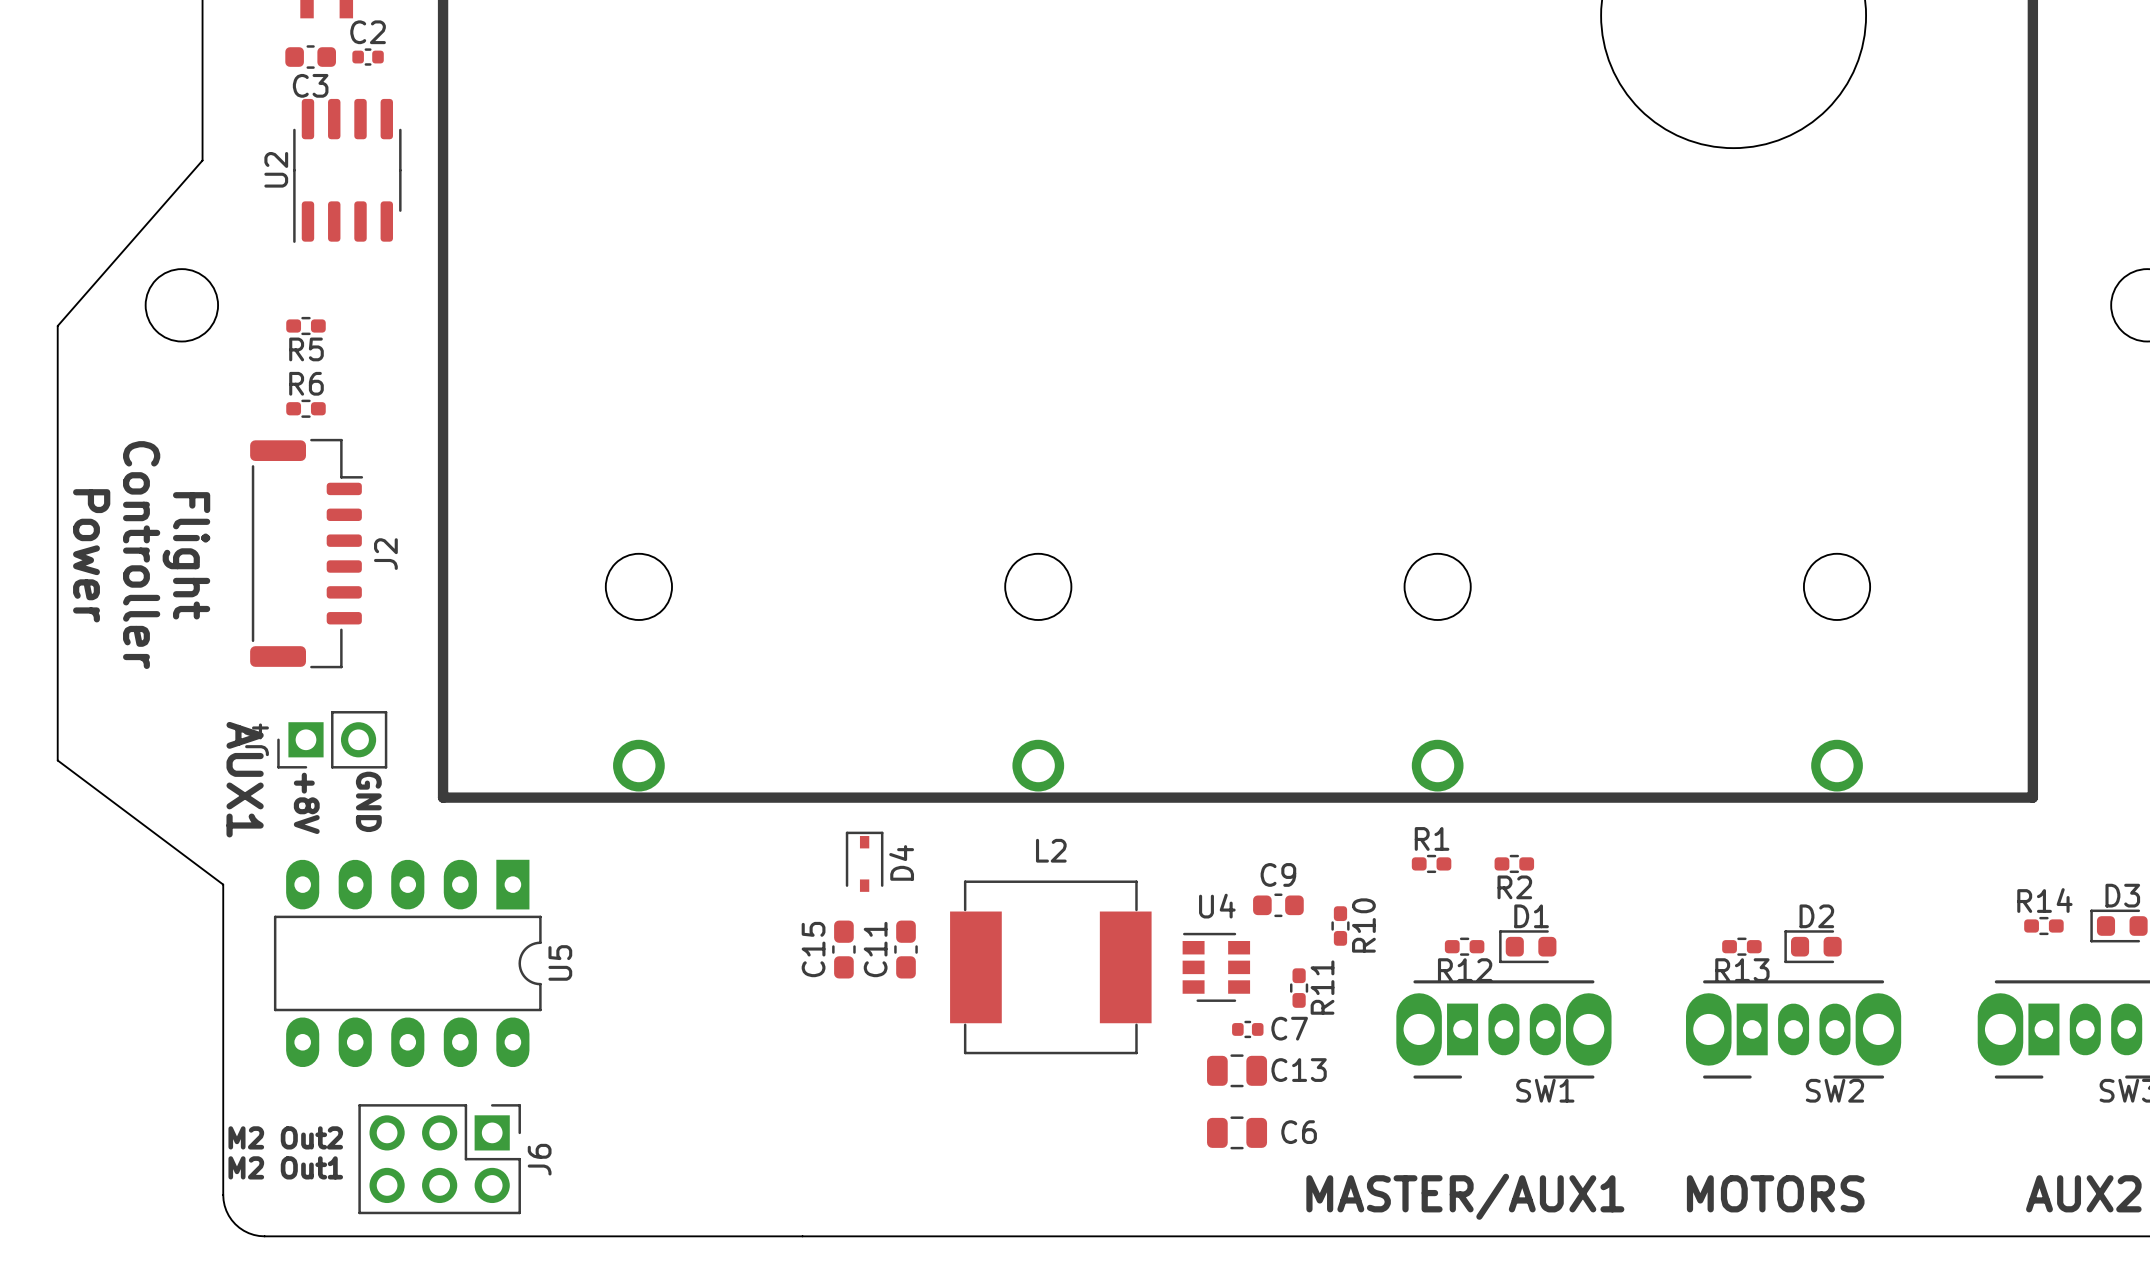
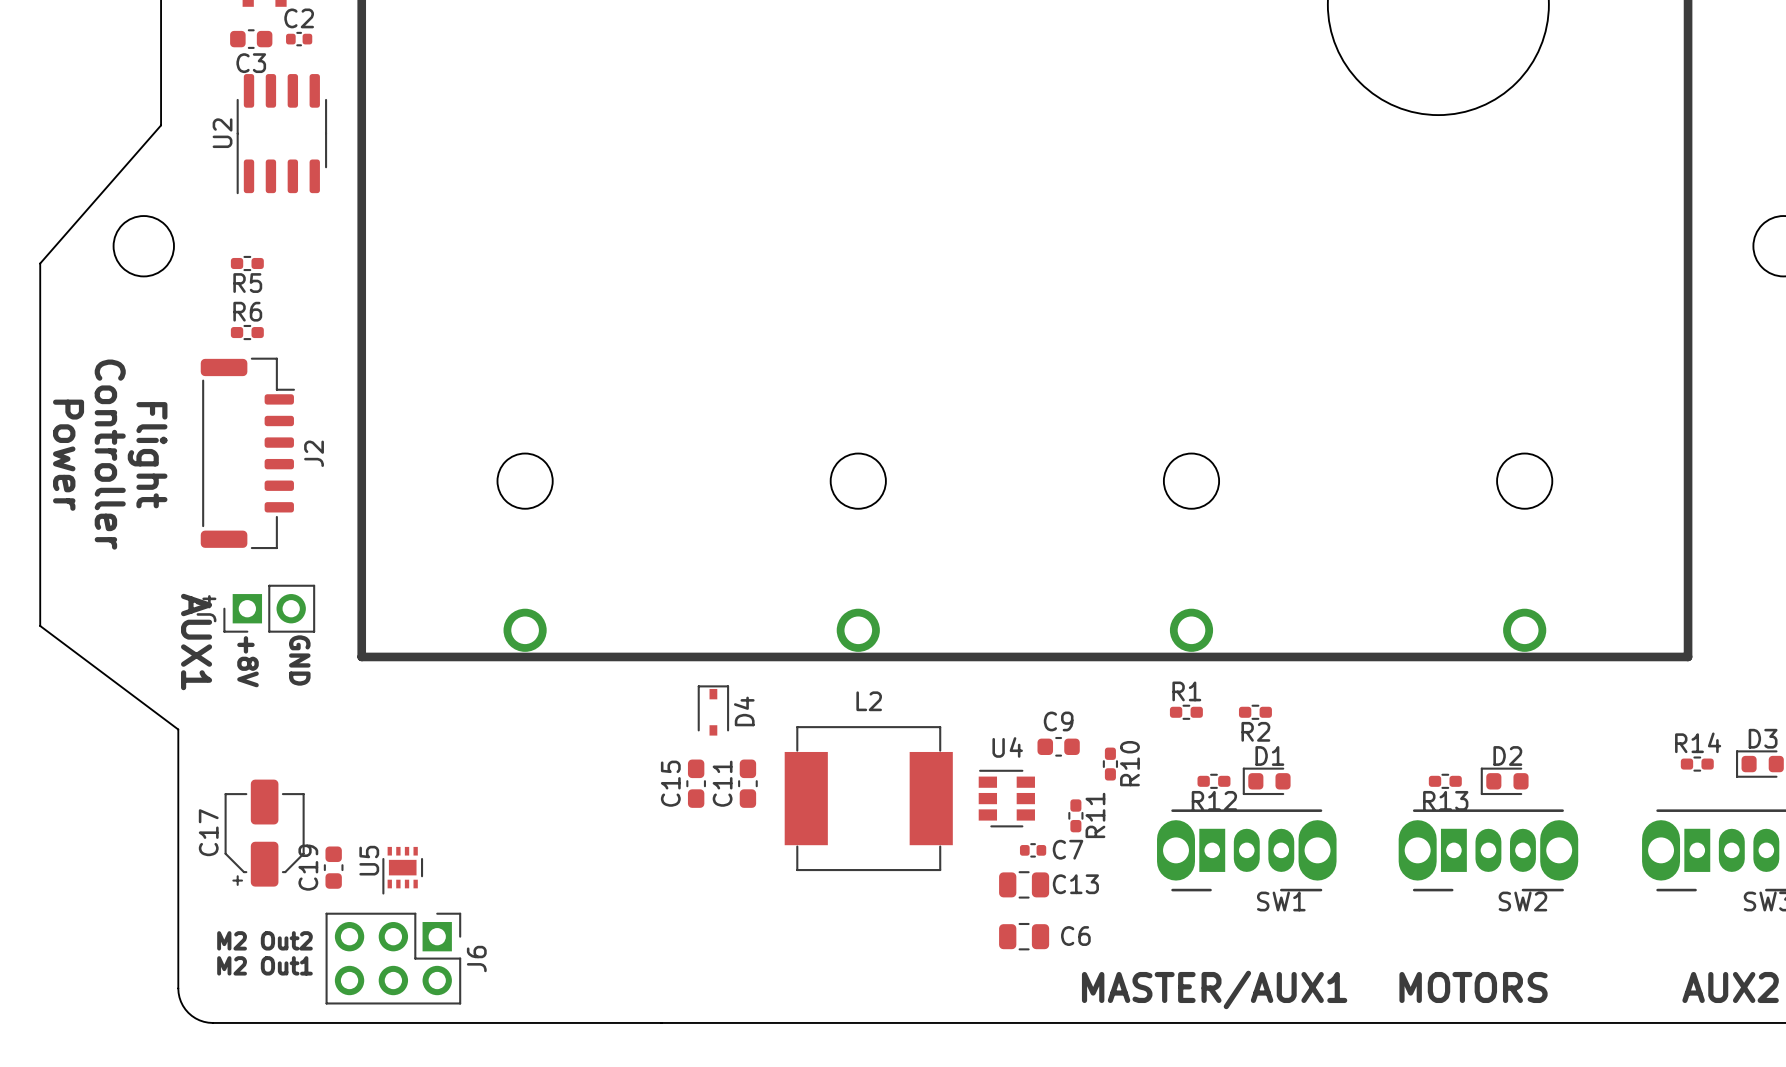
U5 footprint: [273, 859, 542, 1068] -> [382, 846, 424, 895]
U5 name position: U5 (560, 962) -> U5 (369, 860)
C17: none -> (264, 833)
C19: none -> (333, 867)
text position: M2 Out2 (285, 1137) -> M2 Out2 (264, 940)
J6 position: (439, 1159) -> (393, 958)
text position: M2 Out1 (285, 1167) -> M2 Out1 (264, 965)

